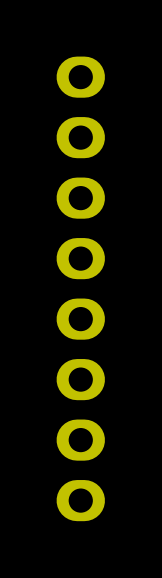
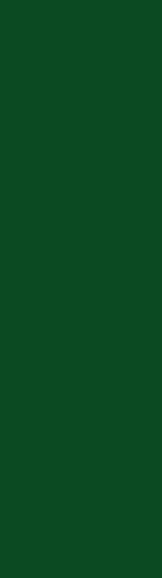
part: (80, 288) -> none

